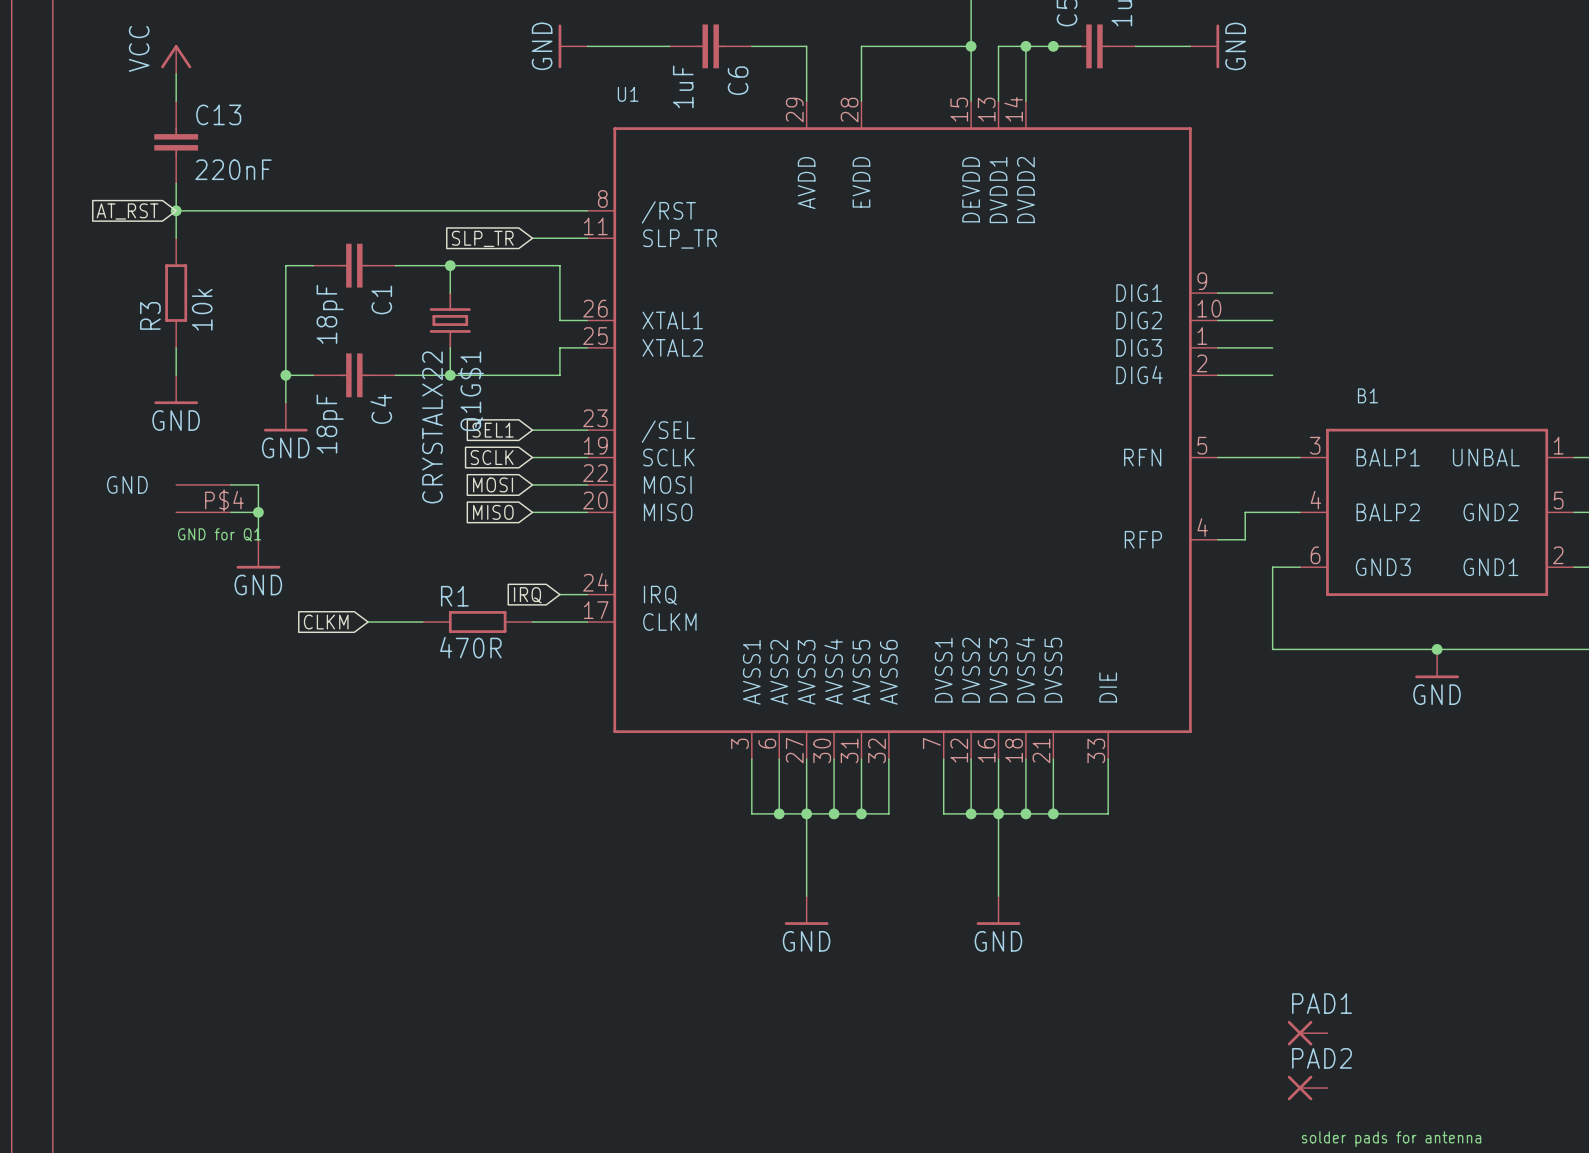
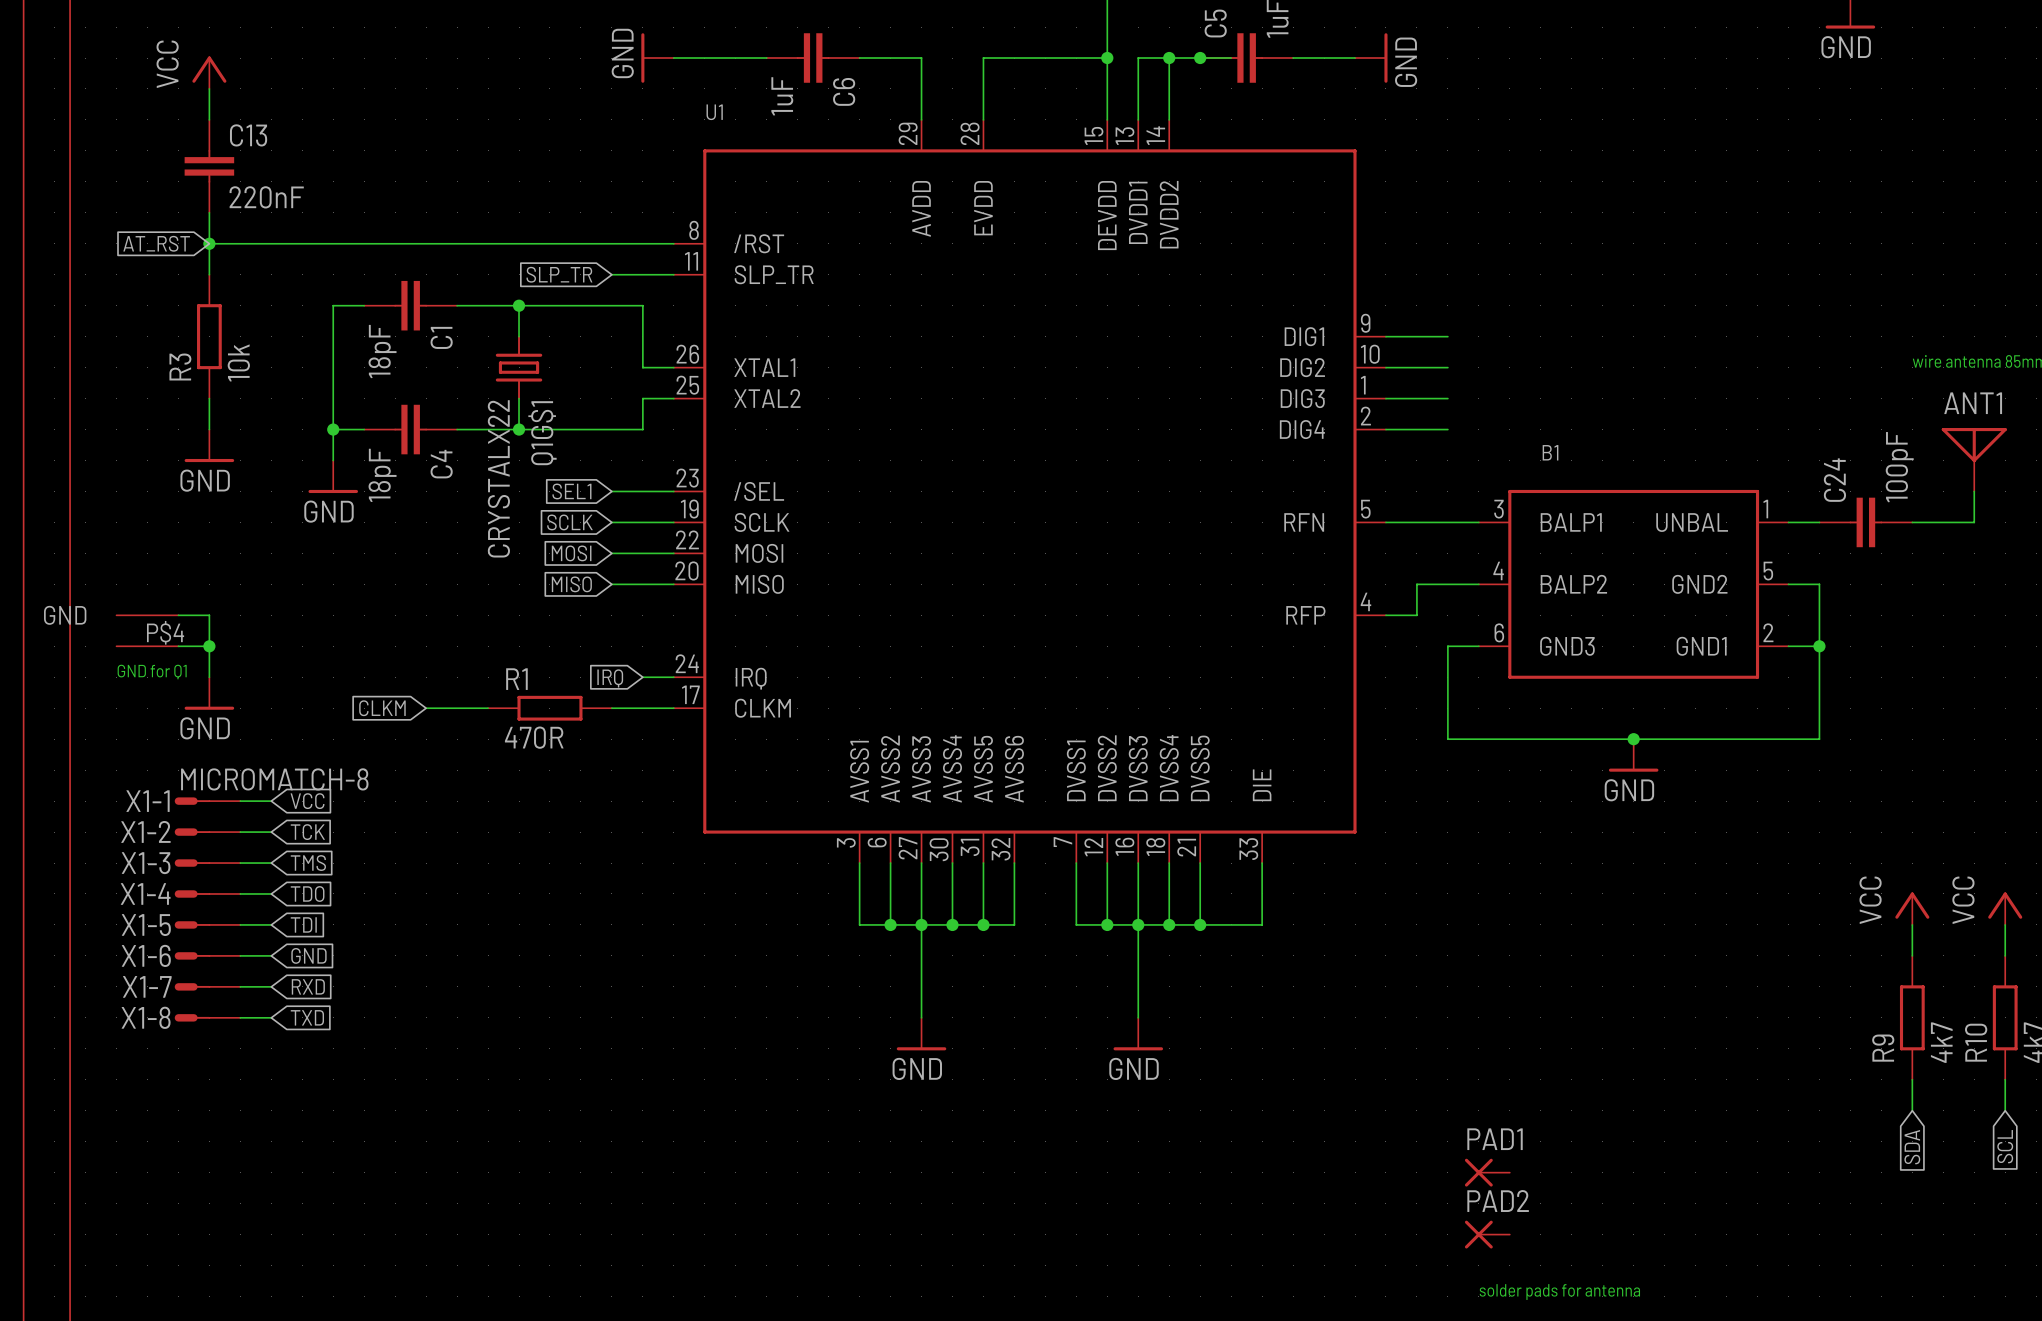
wire: (231, 484) (258, 484) (258, 539) -> (178, 615) (209, 615) (209, 677)
part position: (203, 498) -> (147, 630)
wire: (231, 512) (258, 512) -> (178, 646) (209, 646)
junction: (258, 512) -> none
text position: GND for Q1 (219, 534) -> GND for Q1 (152, 672)
power symbol position: GND (258, 554) -> GND (209, 693)
junction: none -> (209, 646)
X1-1: none -> MICROMATCH-8 (207, 801)
wire: none -> (240, 801) (271, 801)
global label: none -> VCC (307, 801)
X1-2: none -> (207, 832)
wire: none -> (240, 832) (271, 832)
global label: none -> TCK (307, 832)
X1-3: none -> (207, 863)
wire: none -> (240, 863) (271, 863)
global label: none -> TMS (308, 863)
X1-4: none -> (207, 893)
wire: none -> (240, 893) (271, 893)
global label: none -> TDO (307, 893)
X1-5: none -> (207, 924)
wire: none -> (240, 924) (271, 924)
global label: none -> TDI (303, 924)
X1-6: none -> (207, 955)
wire: none -> (240, 955) (271, 955)
global label: none -> GND (308, 955)
X1-7: none -> (207, 986)
wire: none -> (240, 986) (271, 986)
global label: none -> RXD (308, 986)
X1-8: none -> (207, 1017)
wire: none -> (240, 1017) (271, 1017)
global label: none -> TXD (307, 1017)

